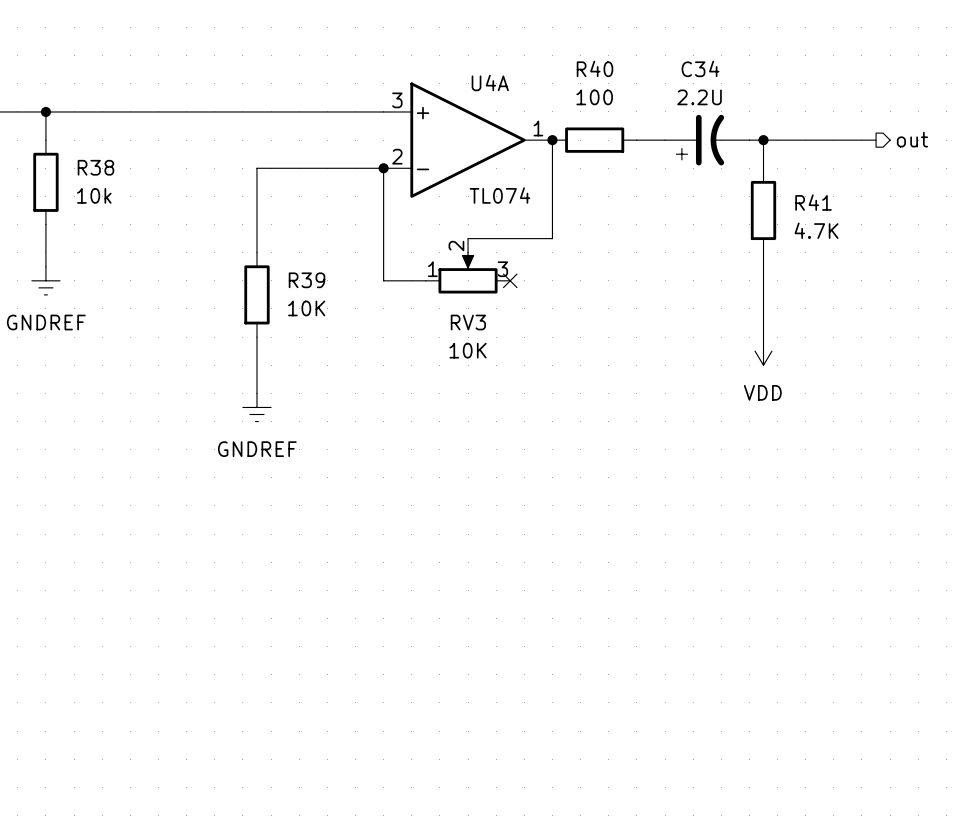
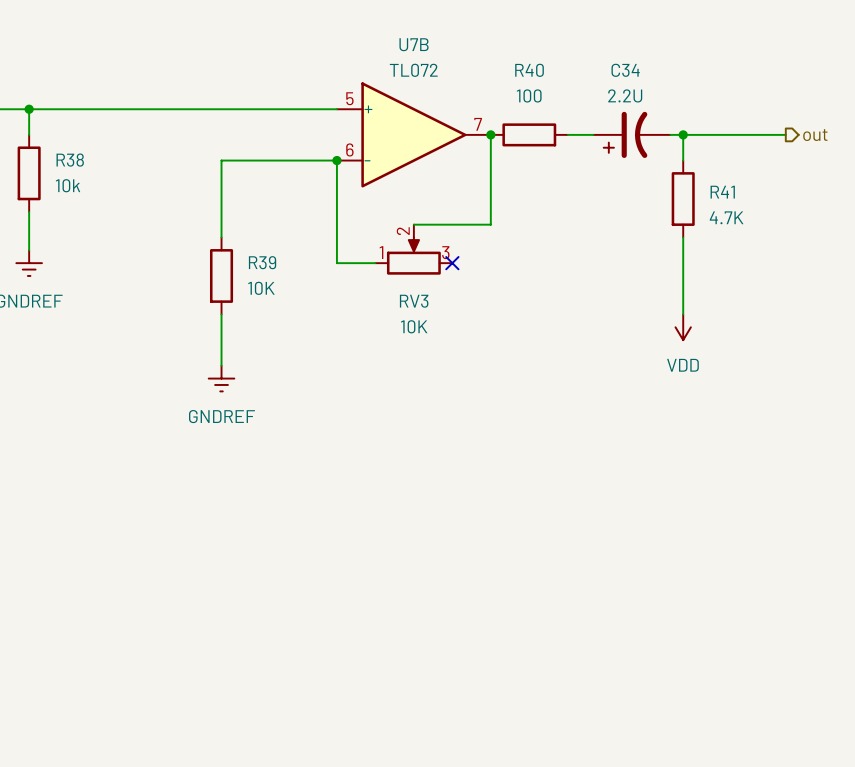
U4A name: U4A (490, 82) -> U7B (414, 44)
U4A pin number: 3 (397, 100) -> 5 (349, 98)
U4A pin number: 1 (538, 128) -> 7 (478, 124)
U4A pin number: 2 (397, 156) -> 6 (349, 149)
U4A value: TL074 (499, 195) -> TL072 (413, 70)

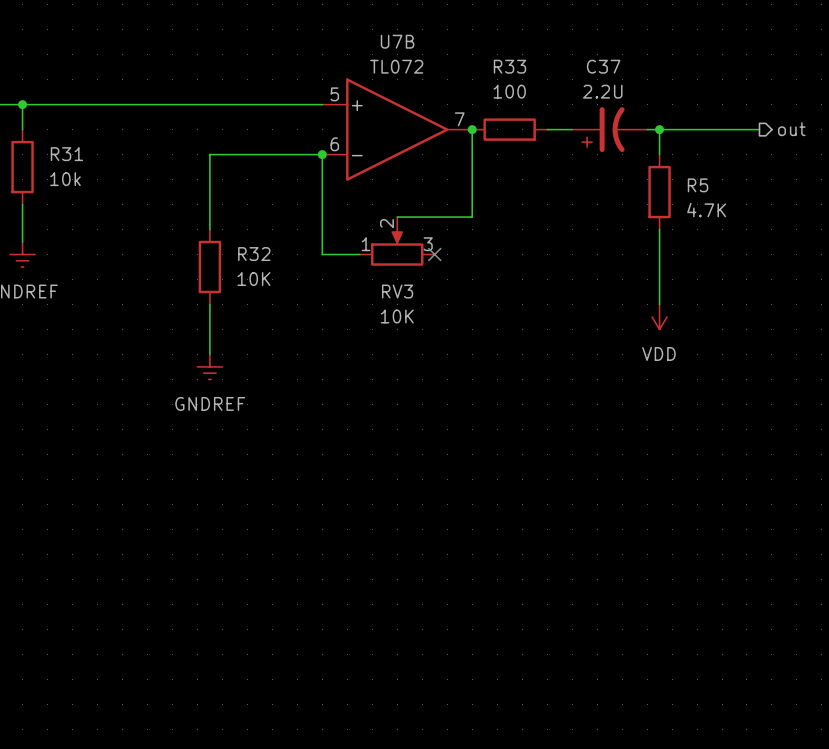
R40 name: R40 (529, 70) -> R33 (509, 66)
C34 name: C34 (625, 70) -> C37 (603, 66)
R38 name: R38 (70, 160) -> R31 (66, 154)
R41 name: R41 (722, 192) -> R5 (698, 185)
R39 name: R39 (262, 262) -> R32 (254, 254)

